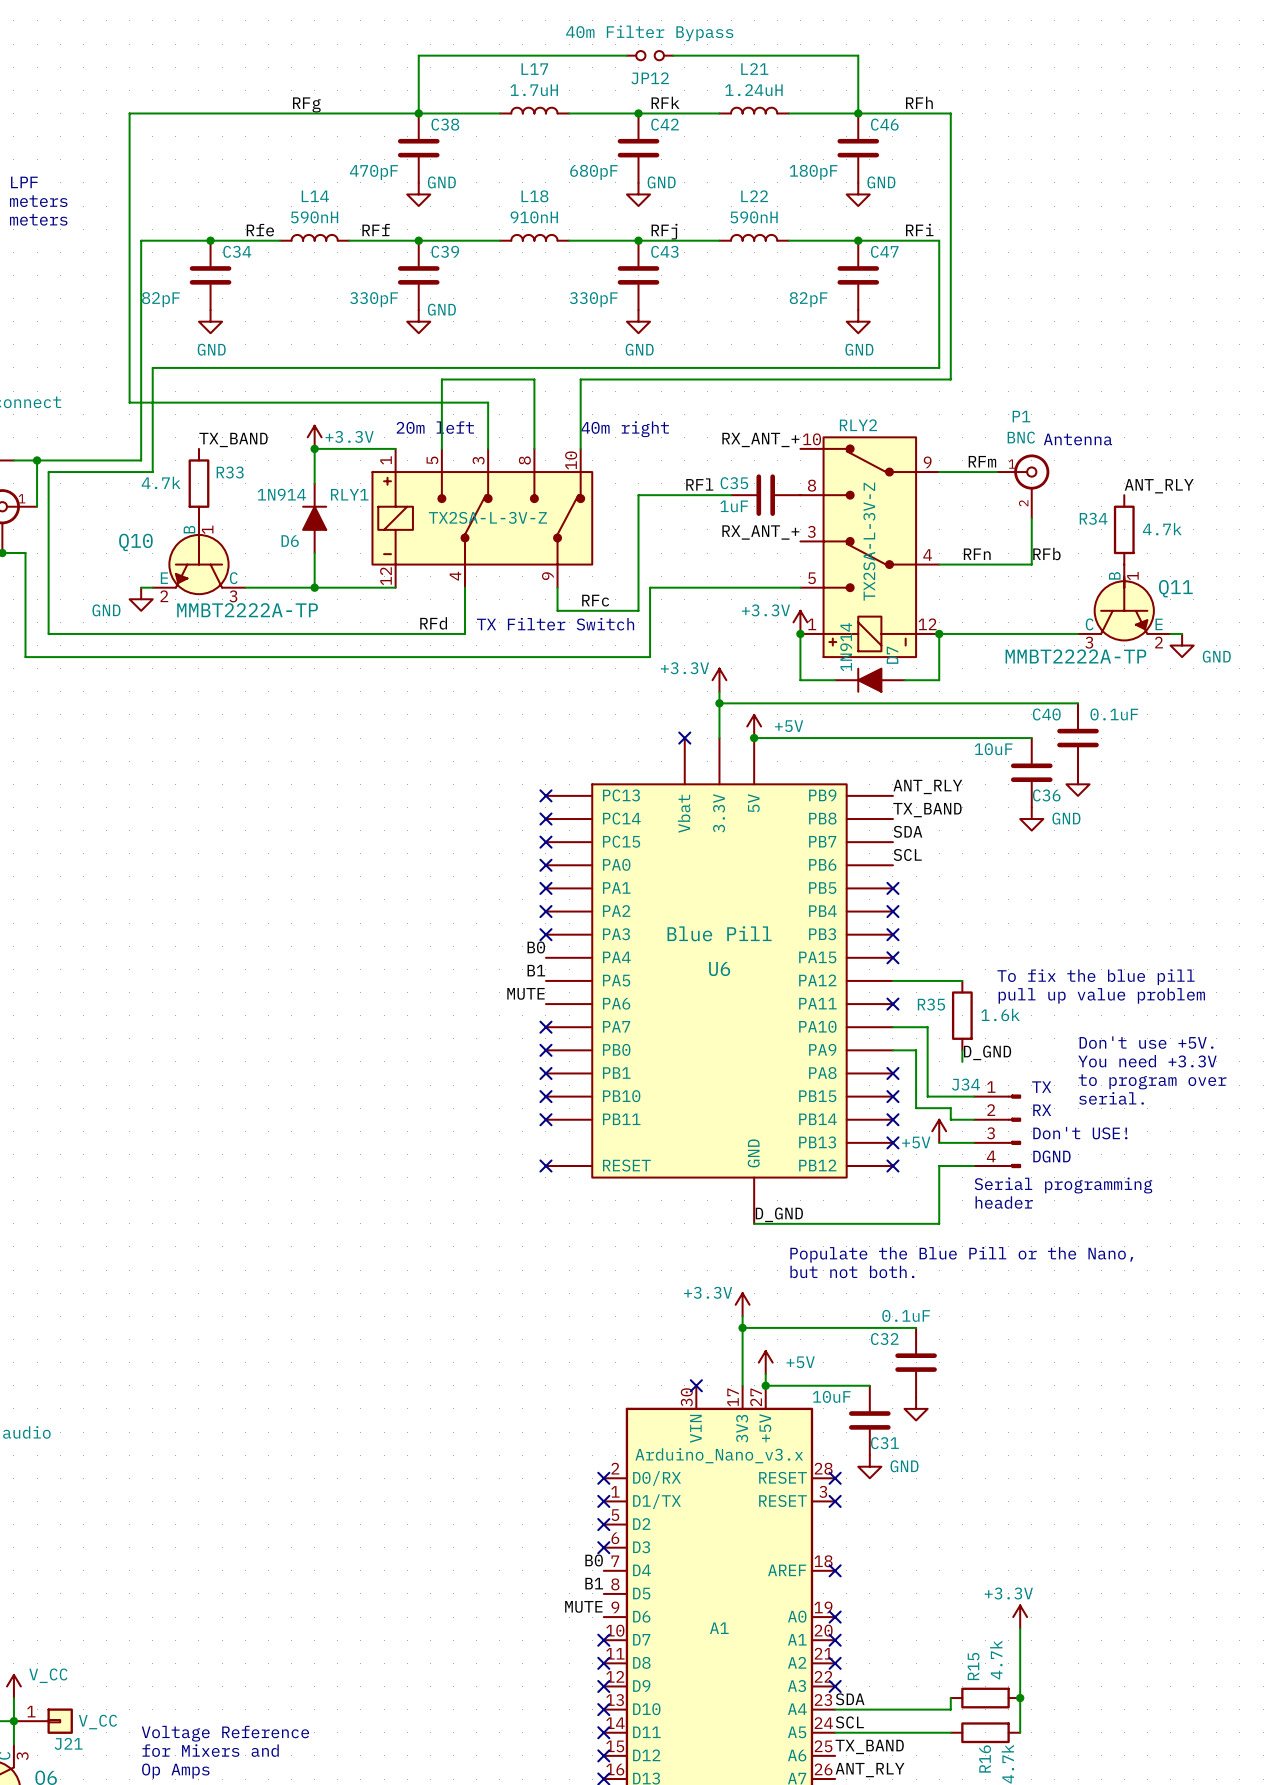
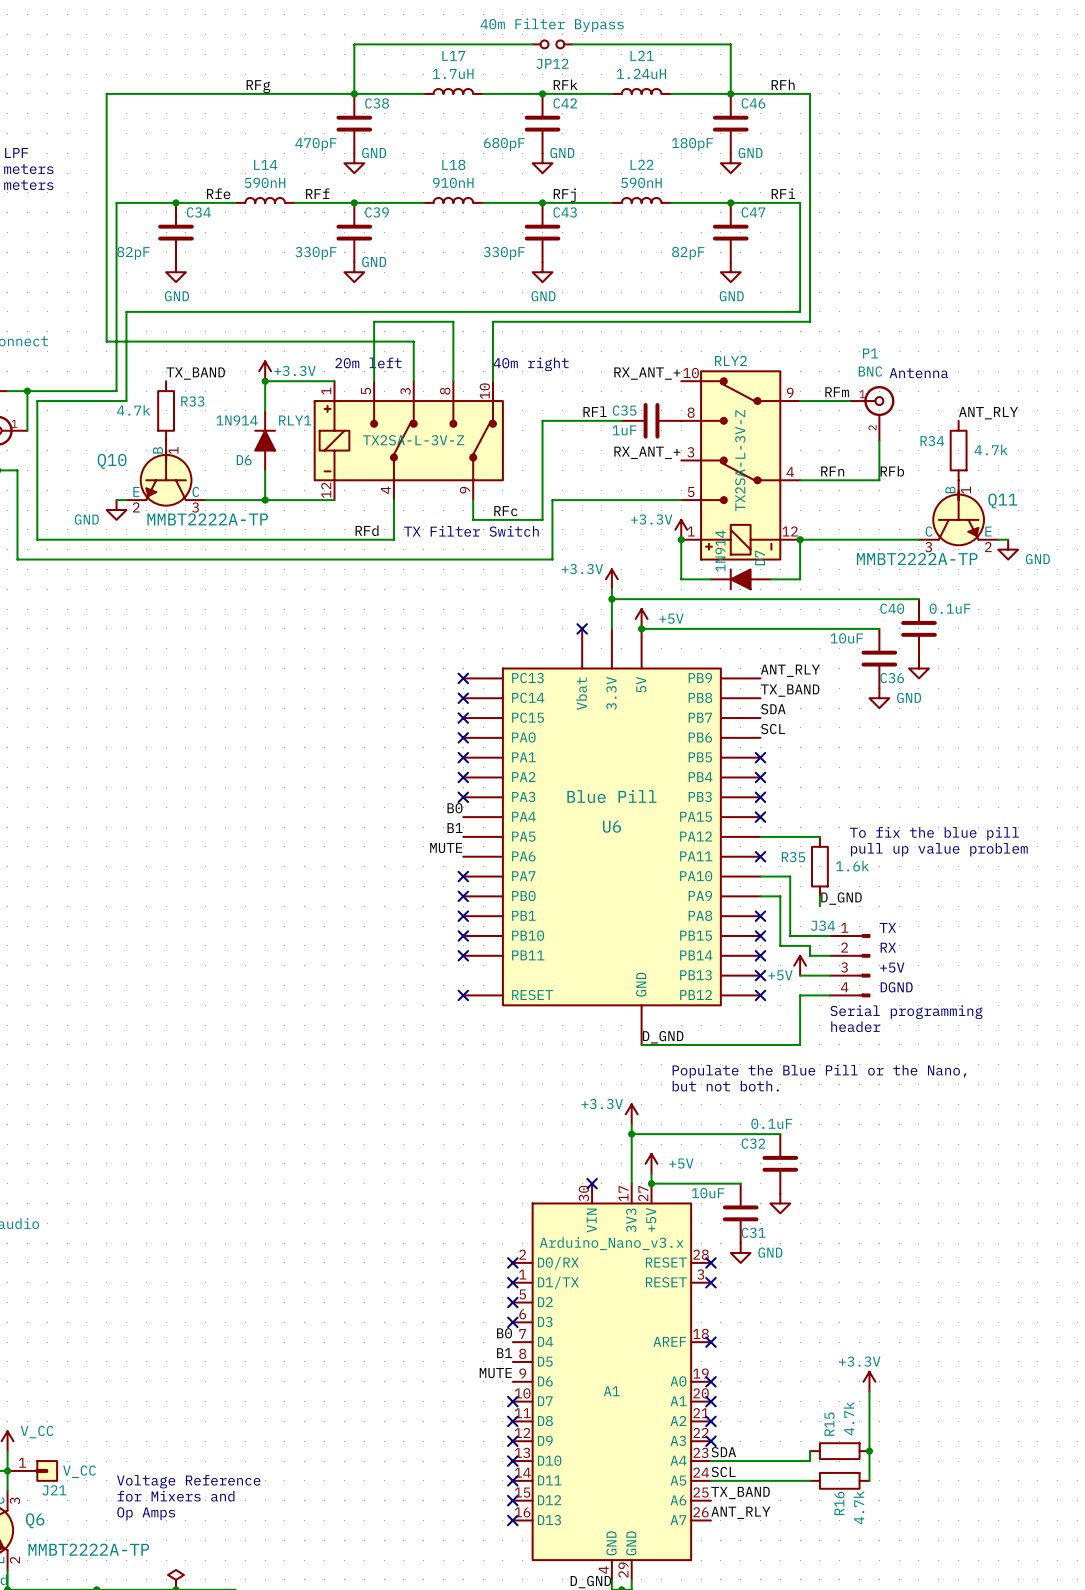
text: Don't use +5V. (1146, 1042) -> none
text: You need +3.3V (1147, 1061) -> none
text: to program over (1152, 1081) -> none
text: serial. (1111, 1098) -> none
text: Don't USE! (1080, 1133) -> +5V (892, 967)

